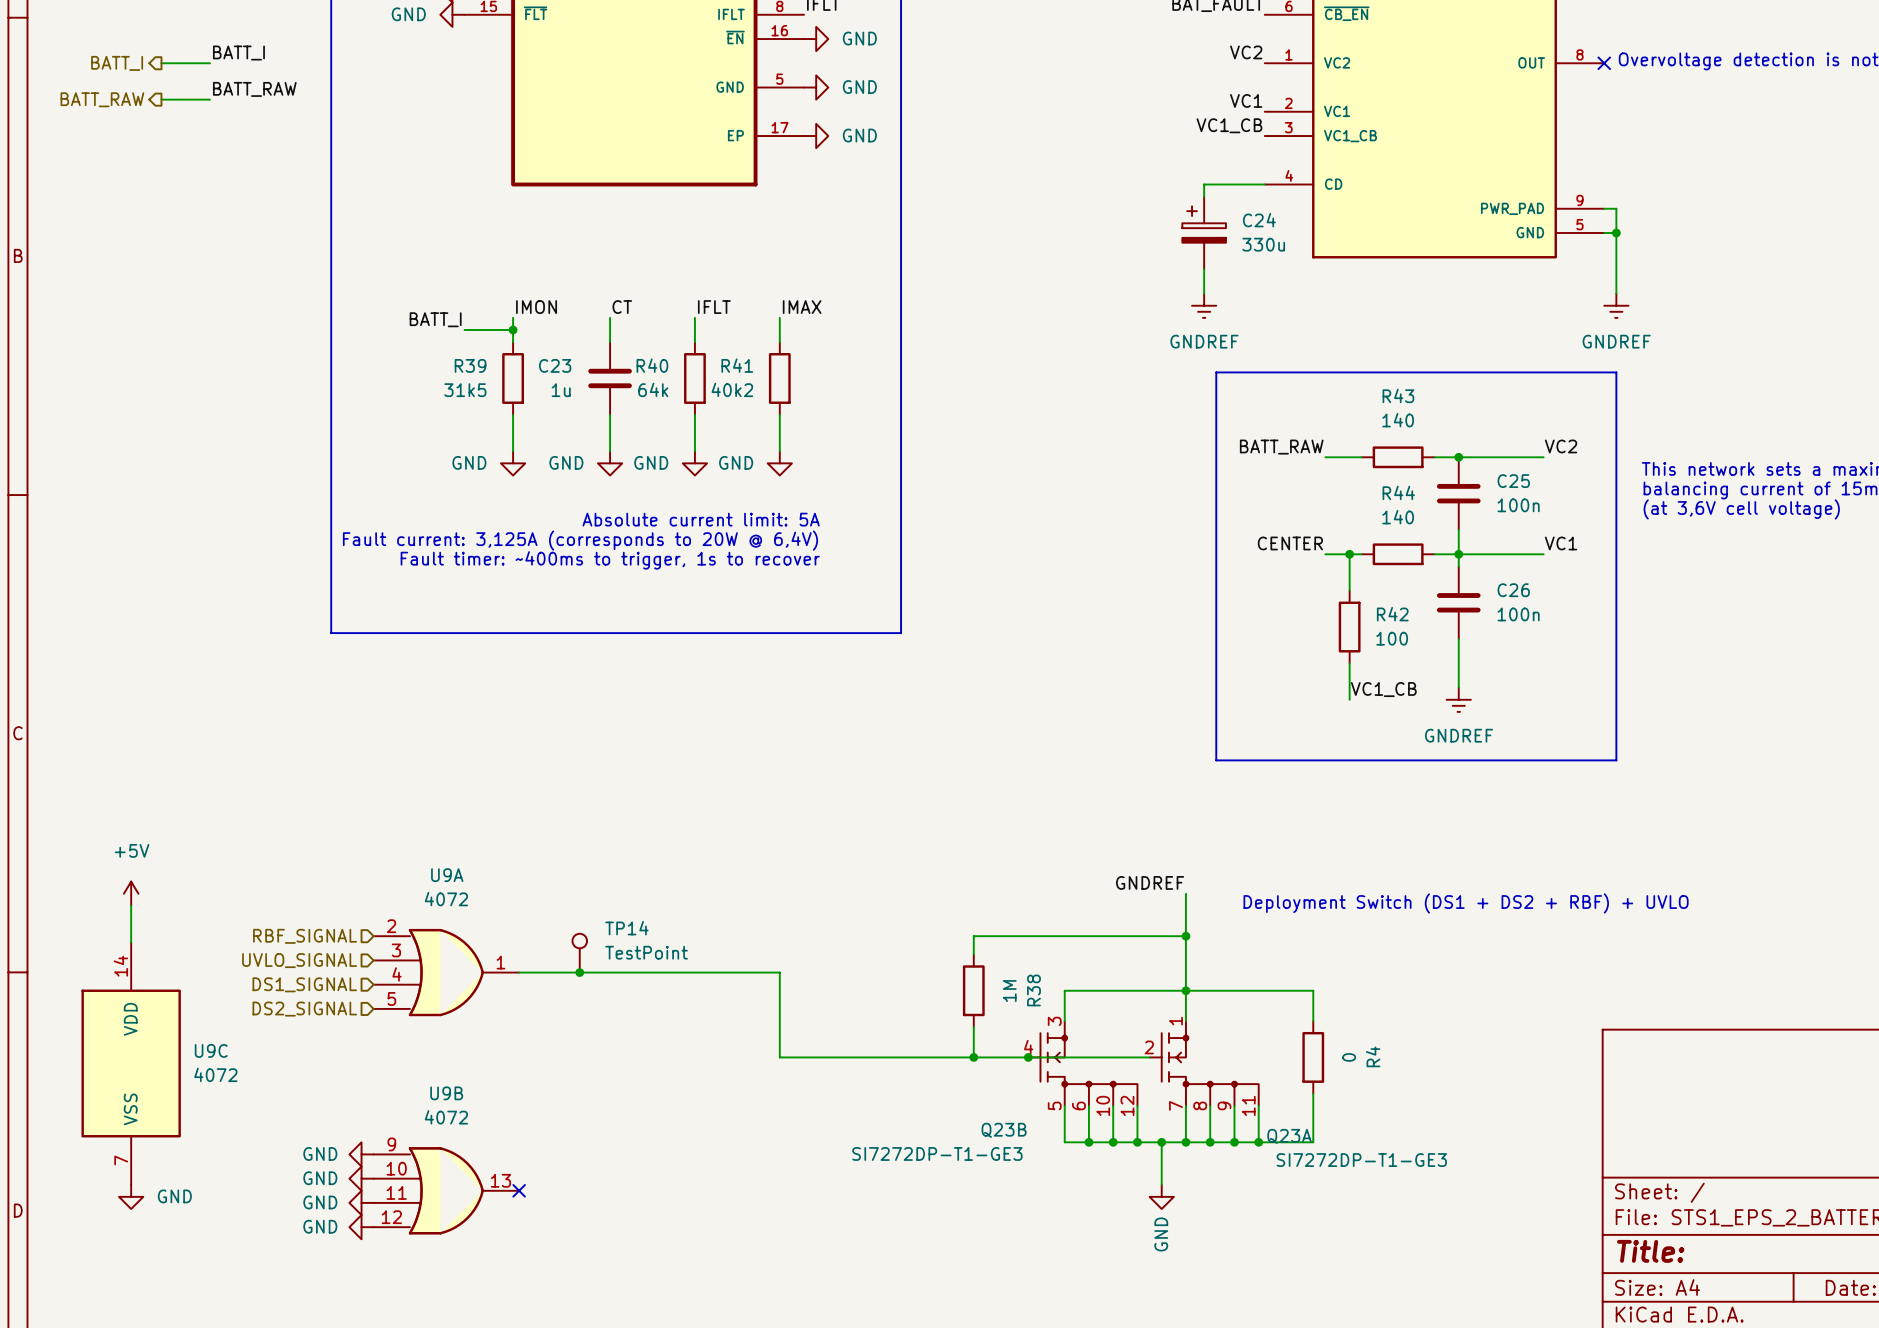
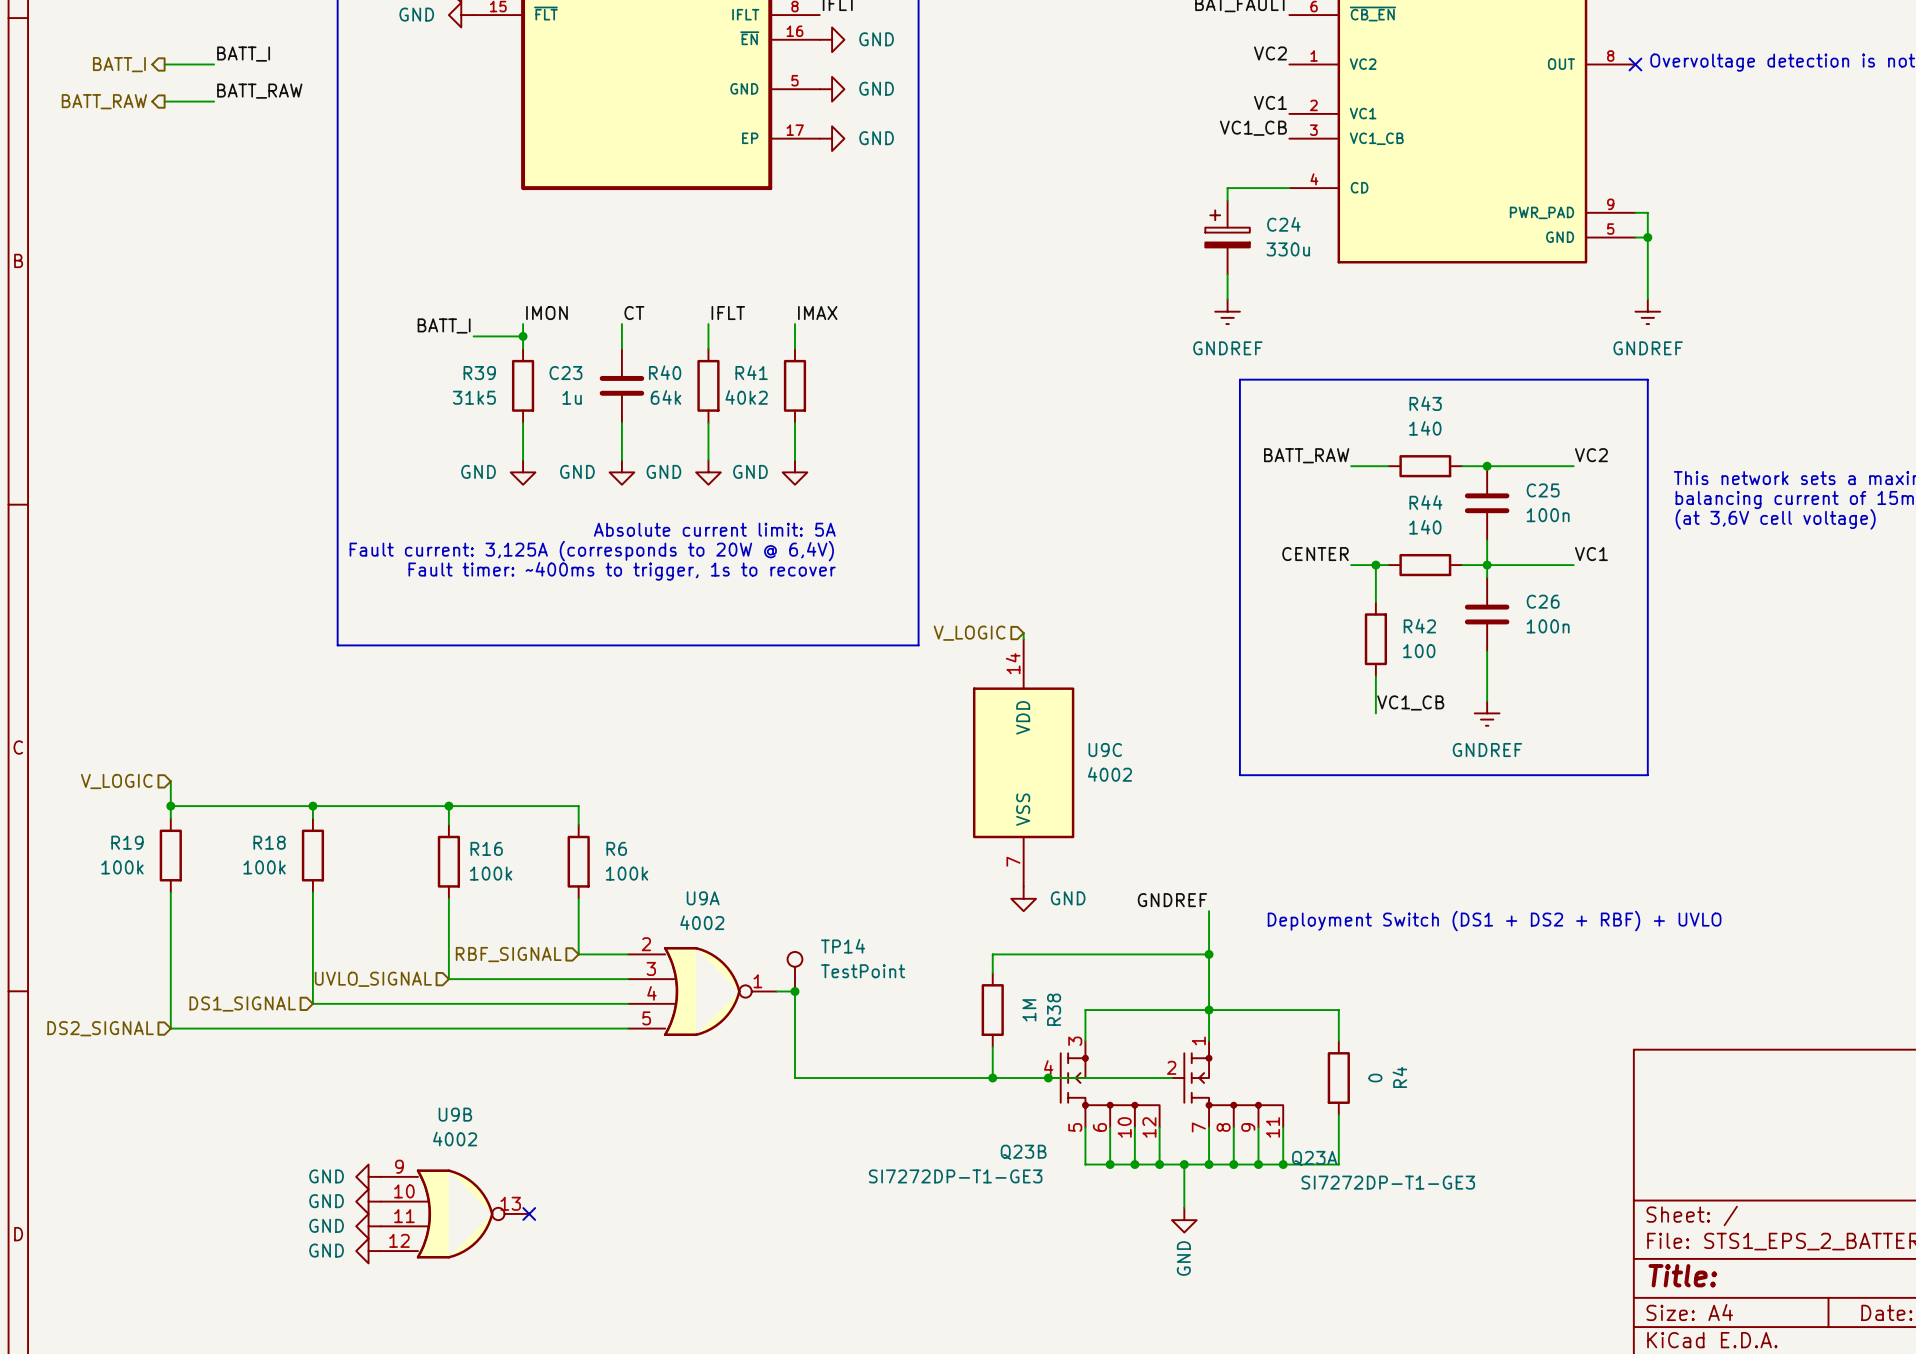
wire: none -> (1023, 633) (1023, 639)
hierarchical label: none -> V_LOGIC (969, 633)
hierarchical label: none -> V_LOGIC (116, 781)
wire: none -> (170, 806) (578, 806) (578, 824)
junction: none -> (170, 806)
wire: none -> (312, 806) (312, 818)
junction: none -> (312, 806)
wire: none -> (448, 806) (448, 824)
junction: none -> (448, 806)
R19: none -> 100k (170, 855)
R18: none -> 100k (312, 855)
R16: none -> 100k (448, 861)
R6: none -> 100k (578, 861)
wire: none -> (170, 892) (170, 1028) (628, 1028)
wire: none -> (312, 892) (312, 1003) (628, 1003)
wire: none -> (448, 898) (448, 979) (628, 979)
wire: none -> (578, 898) (578, 954) (628, 954)
power symbol: none -> GND (1023, 898)
power symbol: +5V (131, 893) -> none
U9A value: 4072 (446, 899) -> 4002 (702, 922)
wire: (131, 905) (131, 942) -> (170, 781) (170, 818)
U9A symbol: [373, 928, 520, 1017] -> [628, 947, 777, 1036]
hierarchical label position: RBF_SIGNAL (305, 936) -> RBF_SIGNAL (508, 954)
TP14 position: (579, 953) -> (794, 971)
hierarchical label position: UVLO_SIGNAL (299, 960) -> UVLO_SIGNAL (373, 979)
wire: (519, 972) (761, 972) -> none
junction: (579, 972) -> none
junction: none -> (794, 991)
hierarchical label position: DS1_SIGNAL (304, 984) -> DS1_SIGNAL (242, 1003)
hierarchical label position: DS2_SIGNAL (304, 1009) -> DS2_SIGNAL (100, 1028)
U9C position: (131, 1063) -> (1023, 762)
U9C value: 4072 (215, 1074) -> 4002 (1109, 774)
U9B value: 4072 (446, 1117) -> 4002 (455, 1139)
U9B symbol: [373, 1147, 520, 1235] -> [380, 1169, 530, 1259]
power symbol: GND (131, 1196) -> none

